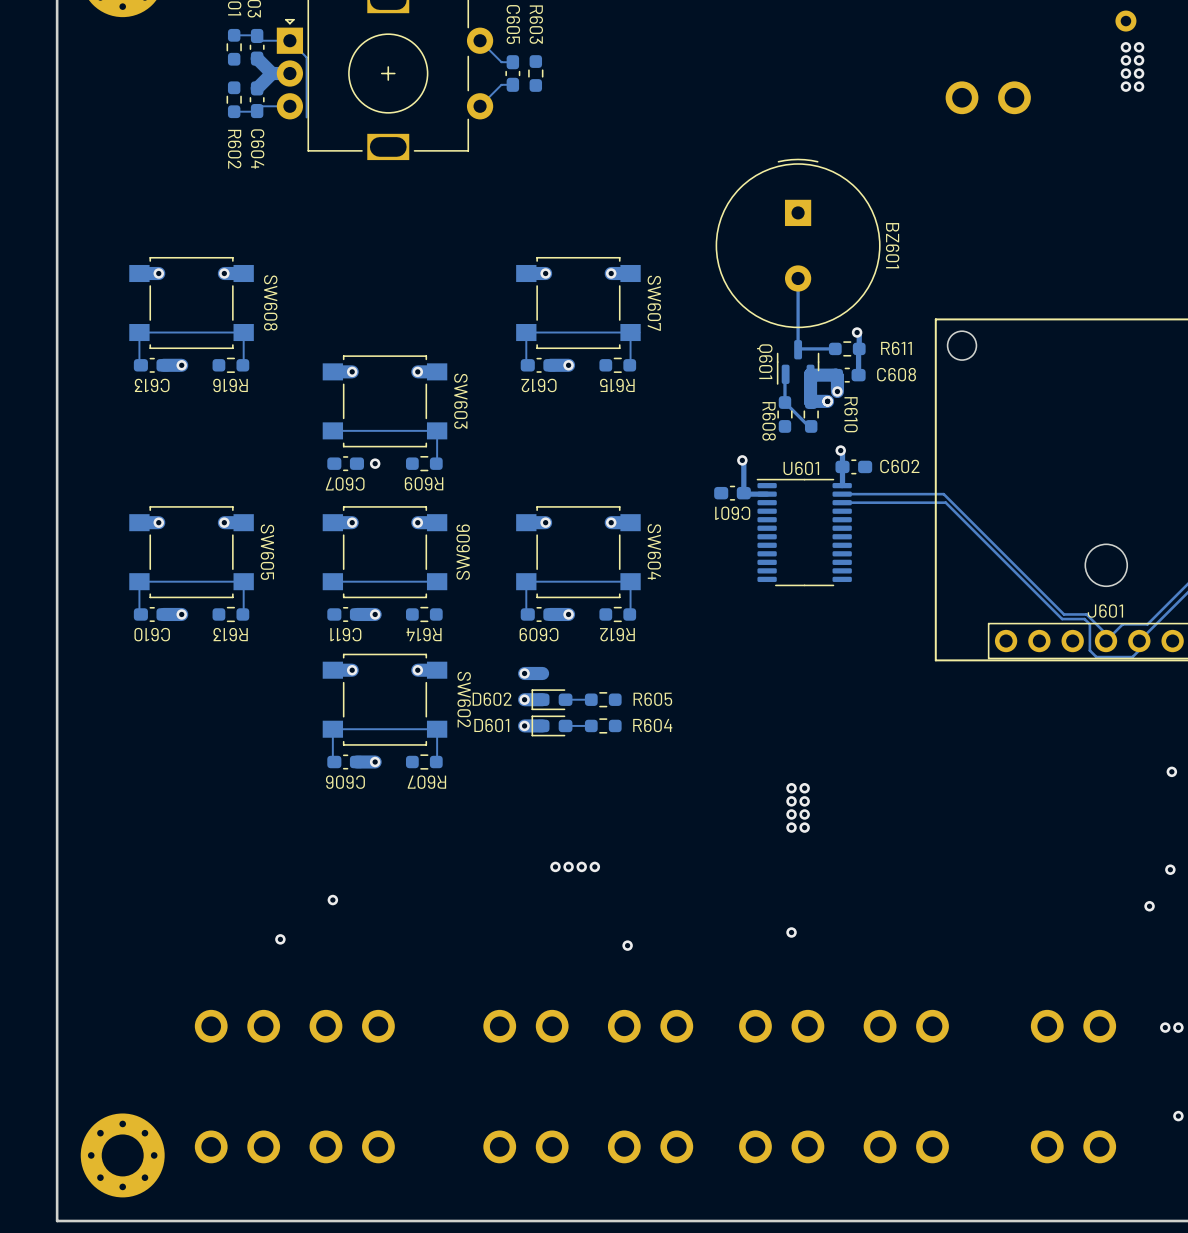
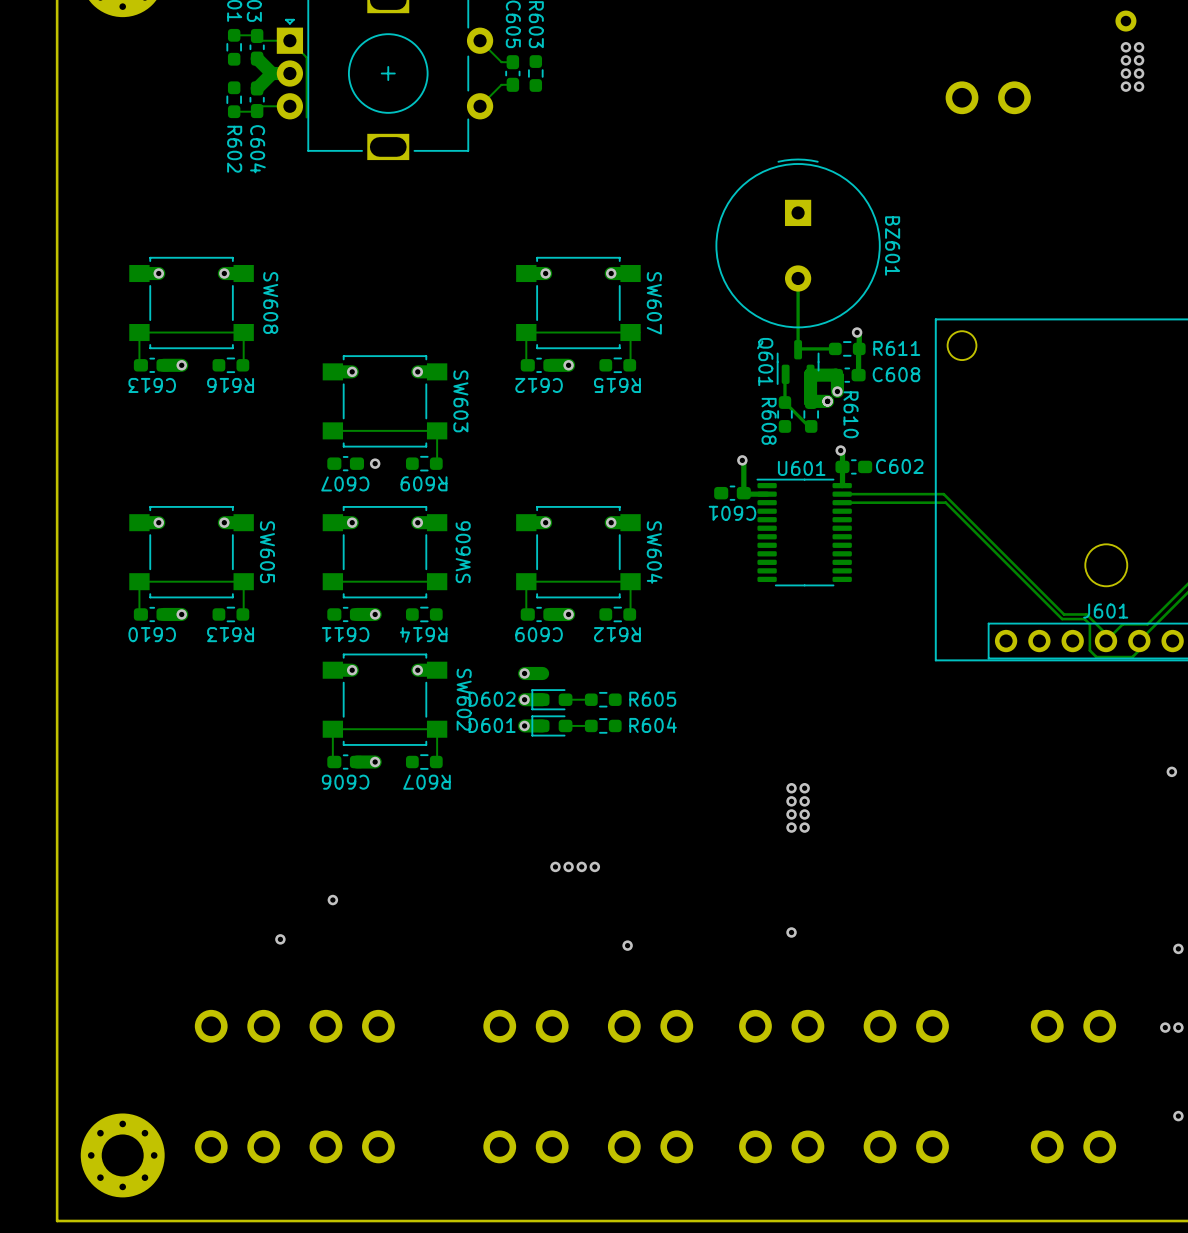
via: (1170, 869) -> none
via: (1149, 906) -> none
via: none -> (1178, 948)

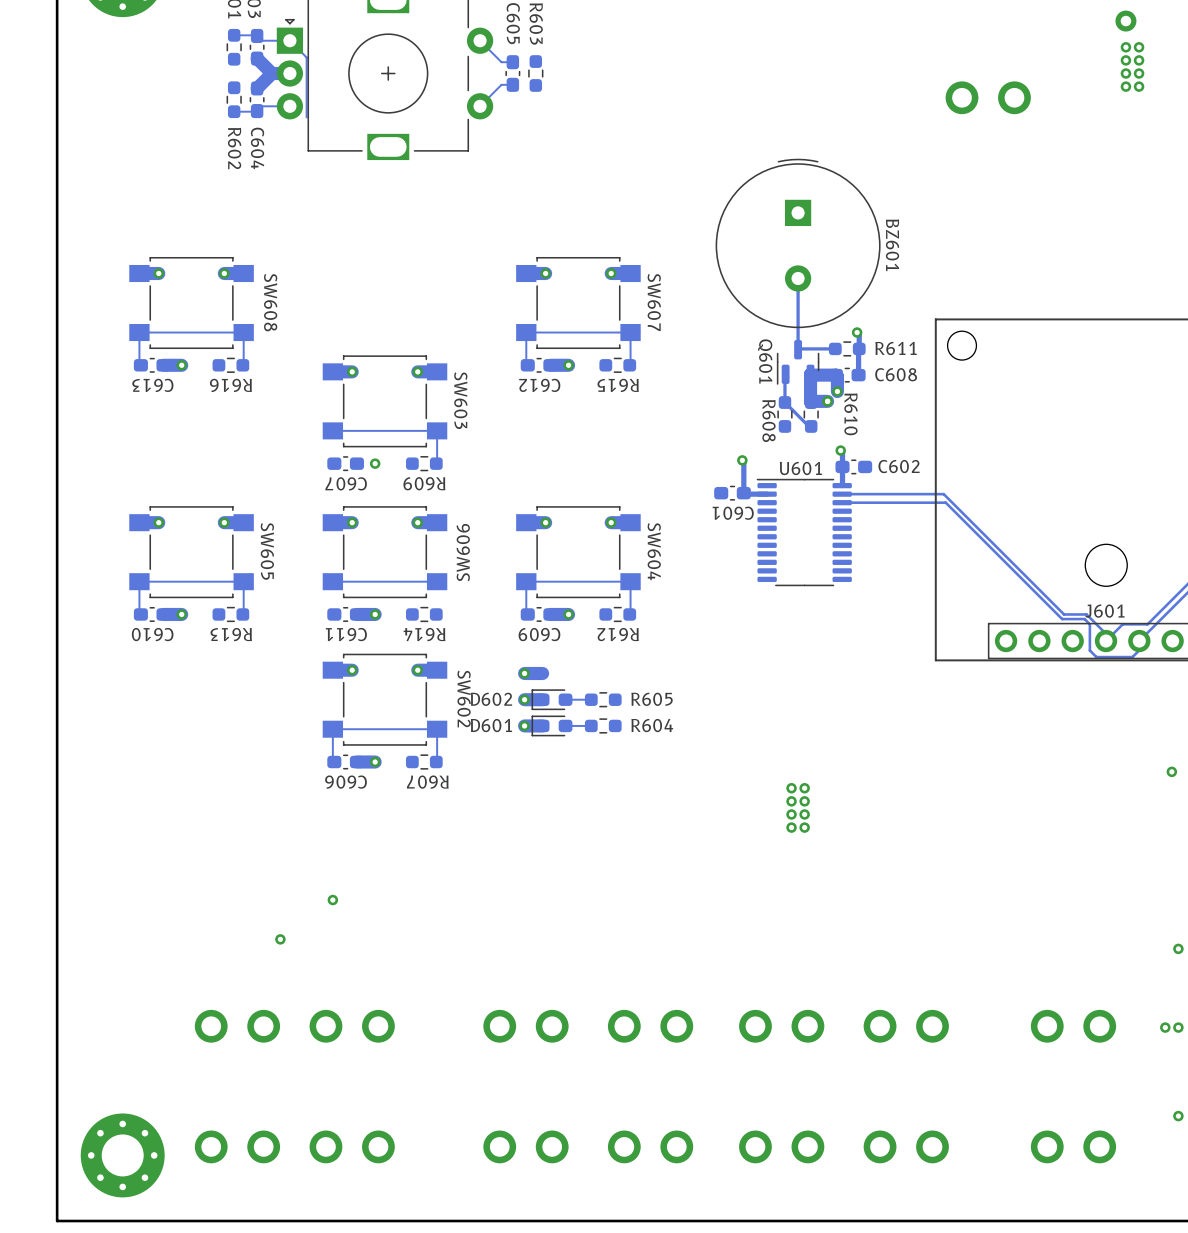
via: (555, 866) -> none
via: (568, 866) -> none
via: (581, 866) -> none
via: (594, 866) -> none
via: (791, 932) -> none
via: (627, 945) -> none

